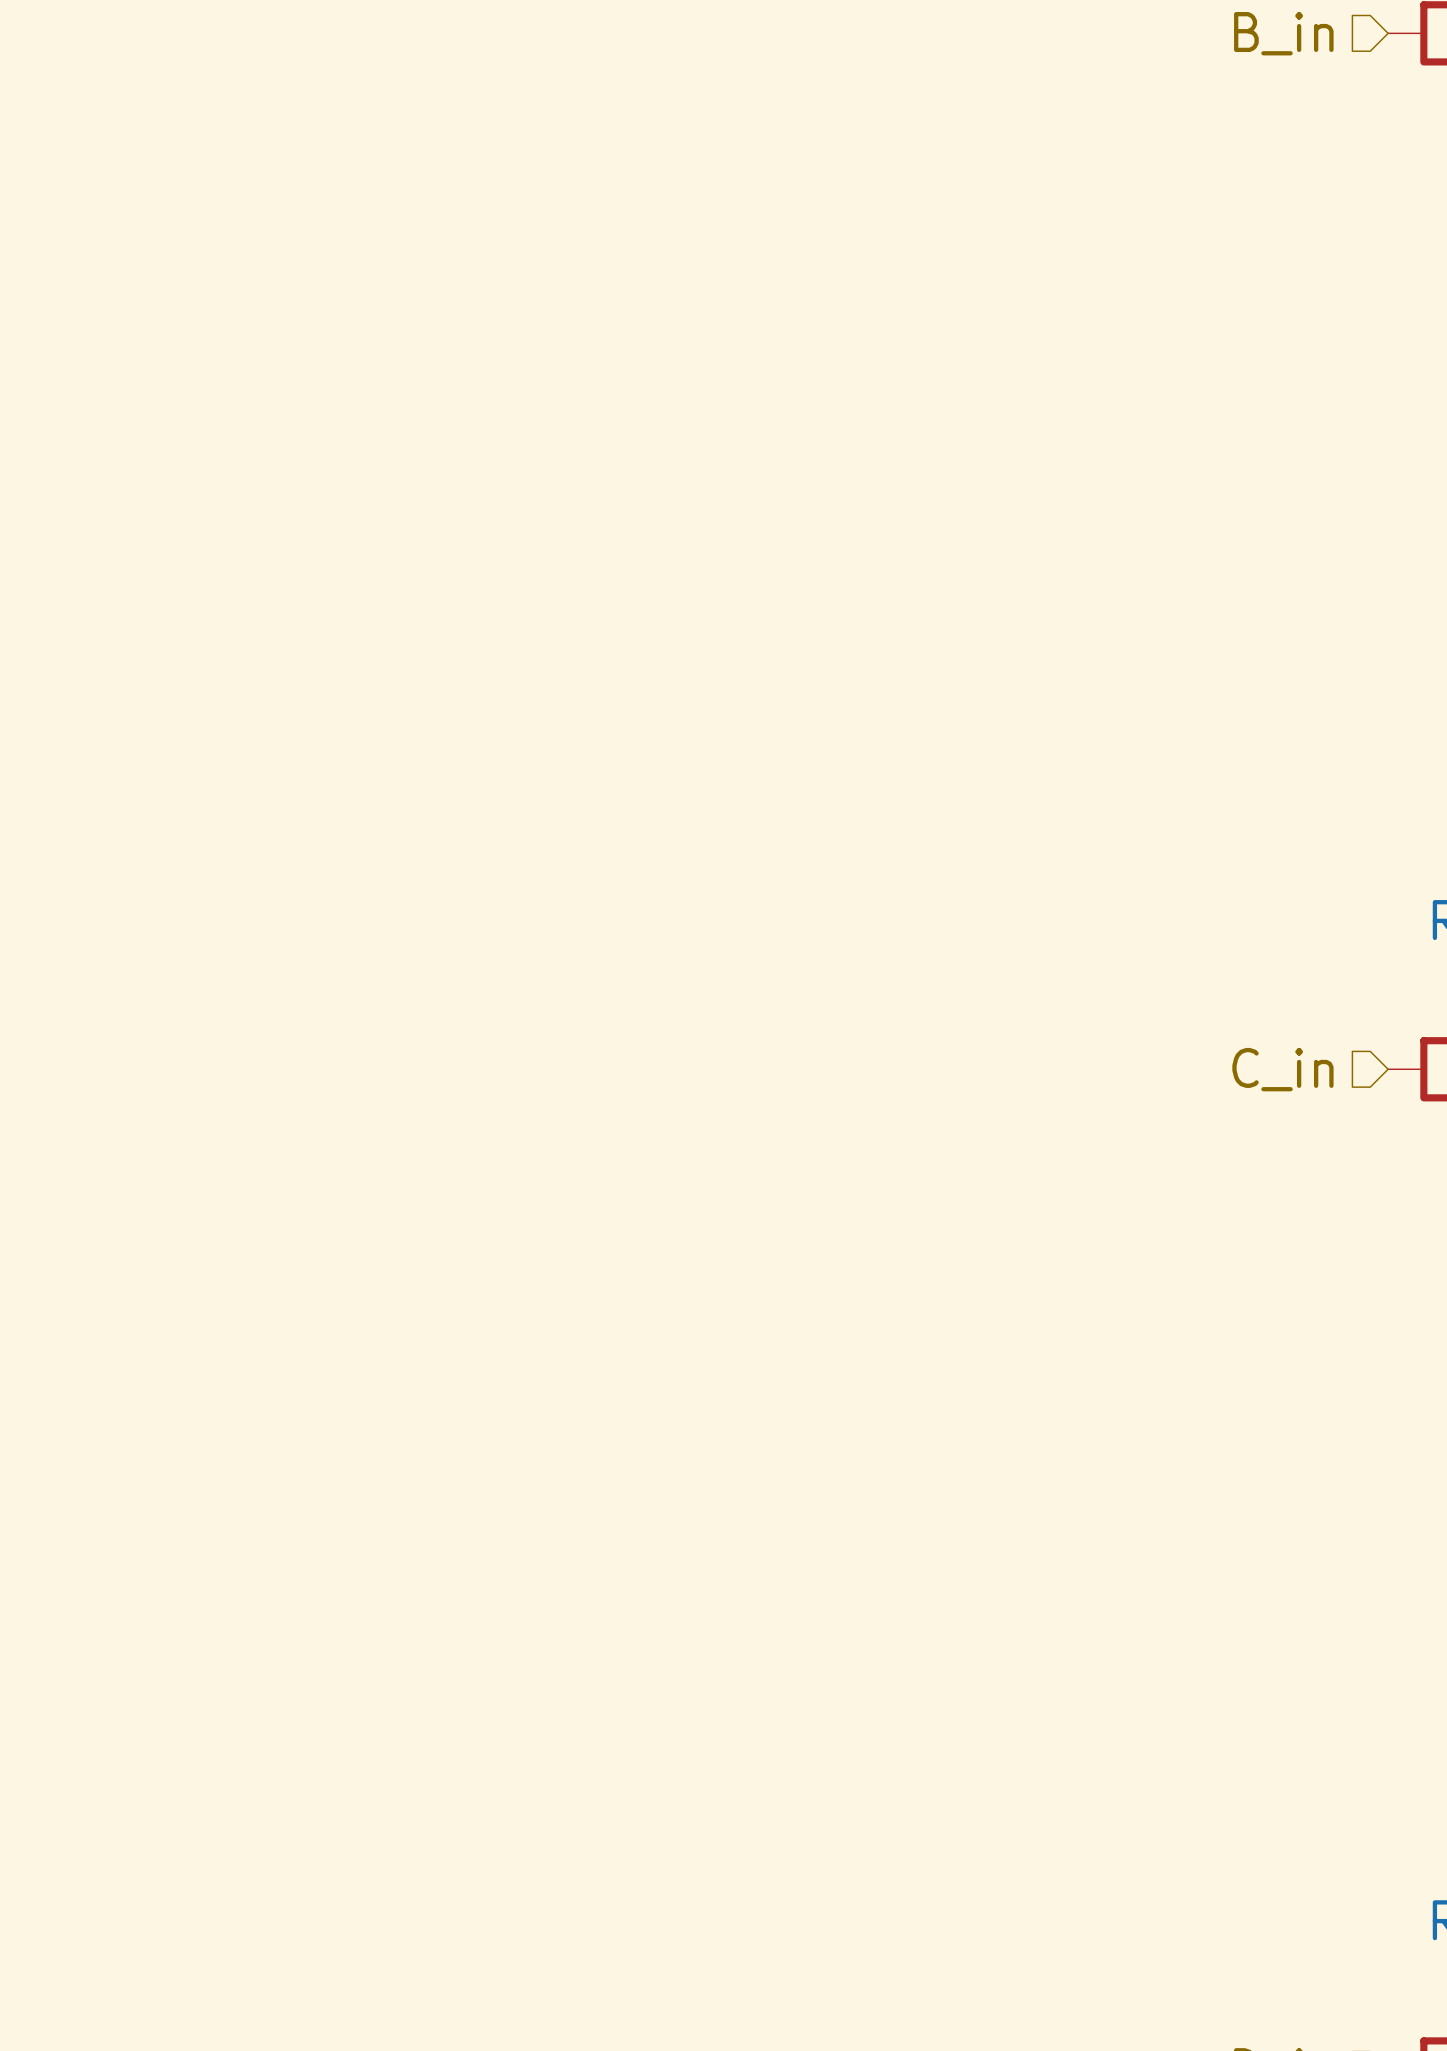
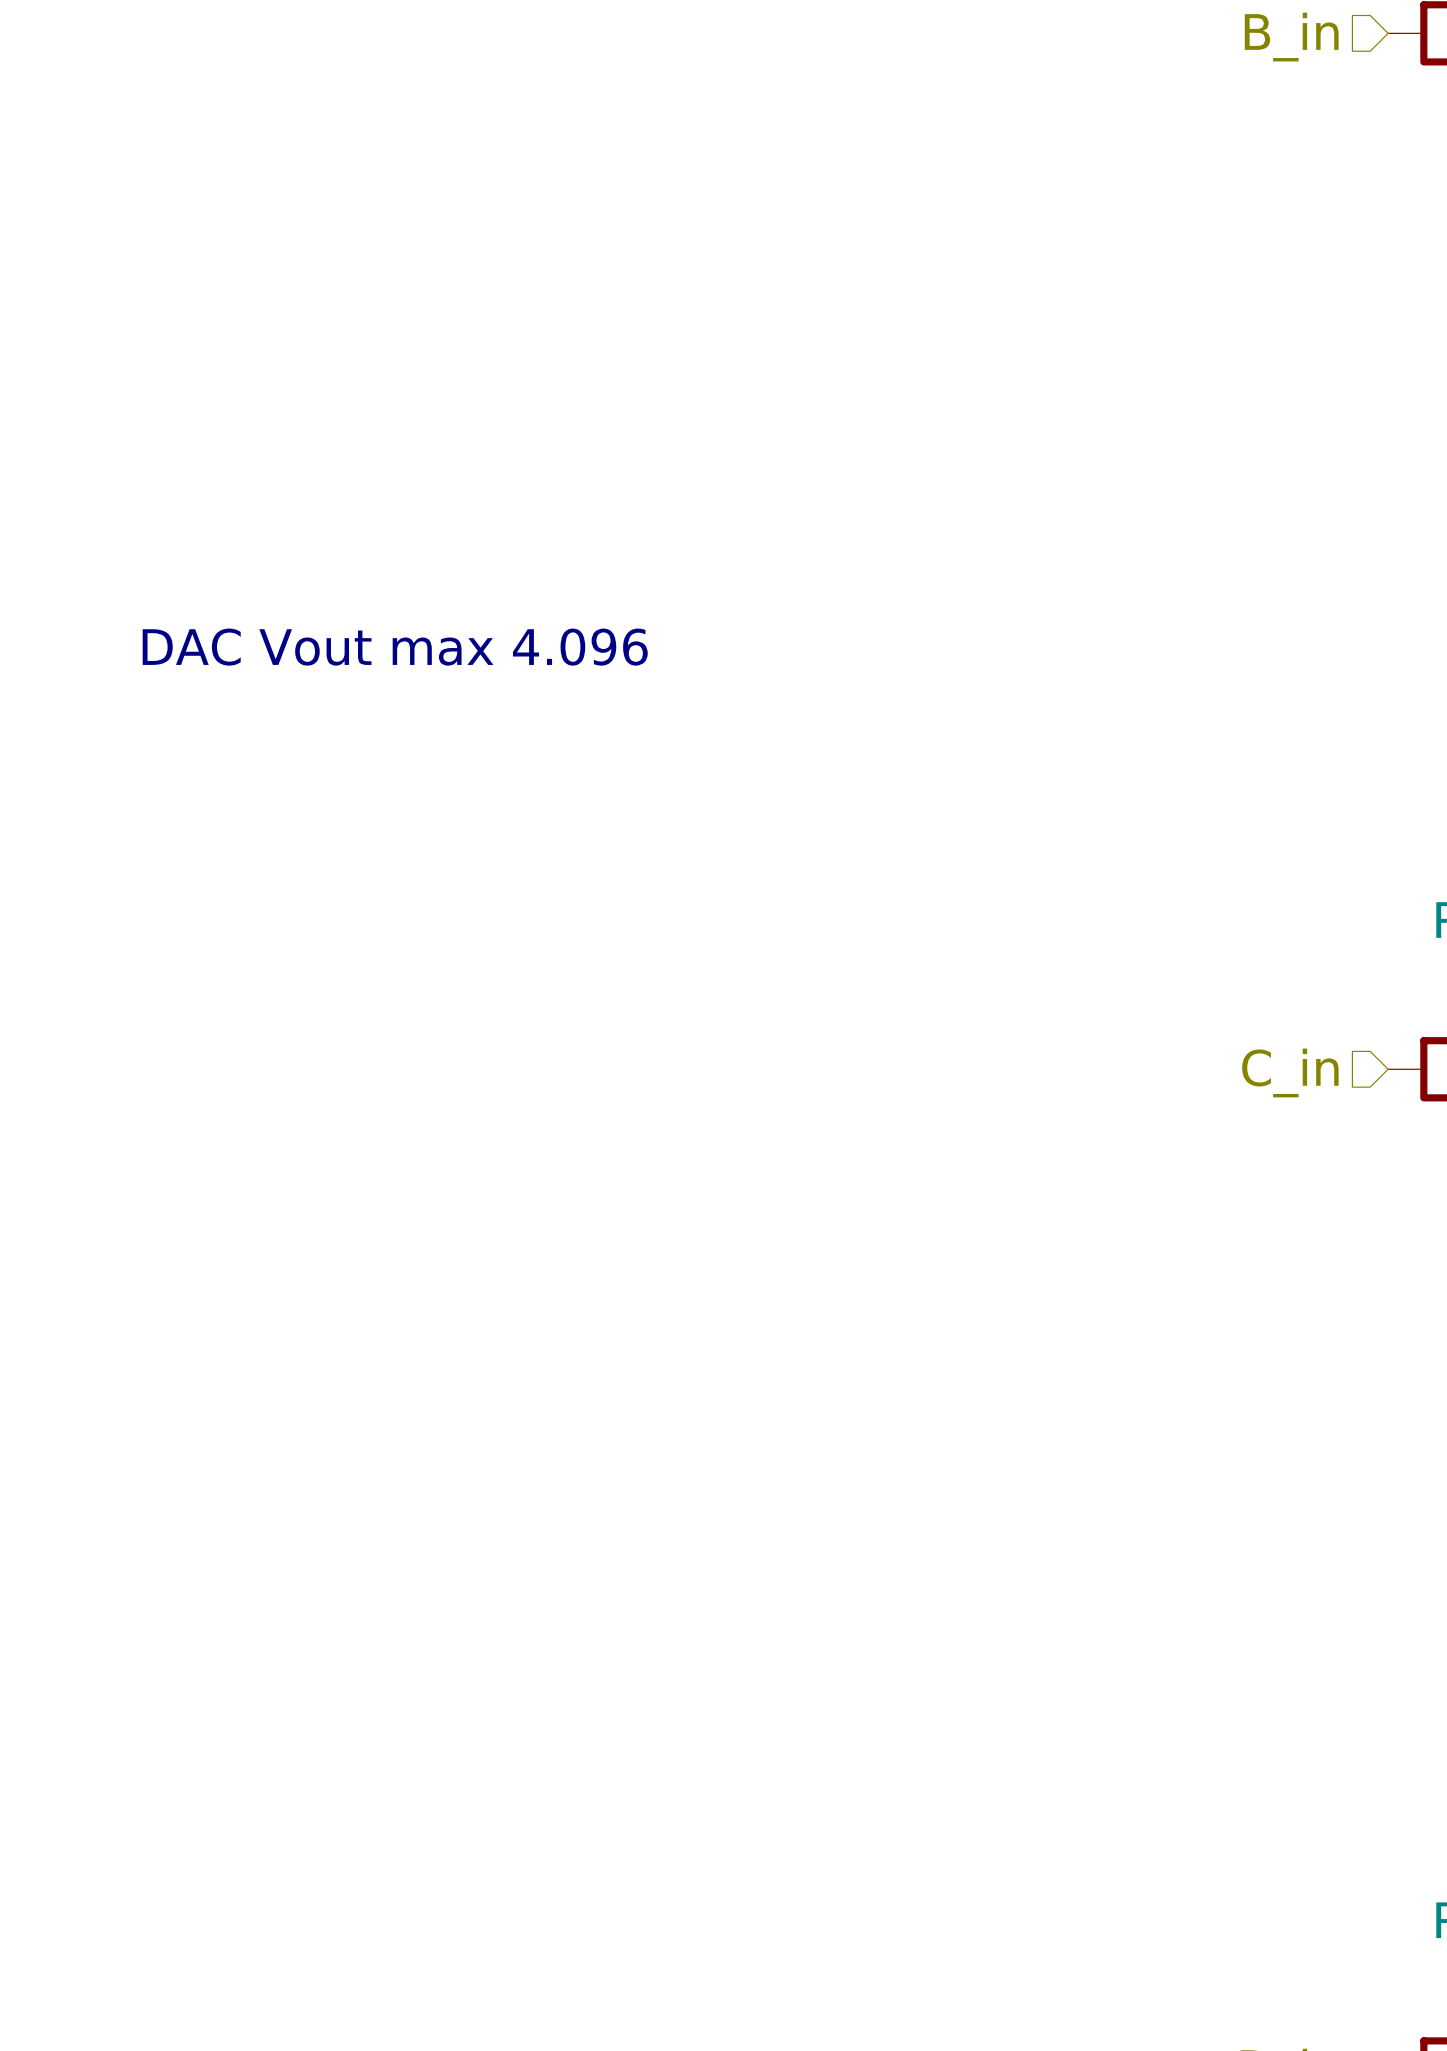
text: none -> DAC Vout max 4.096 (395, 647)

